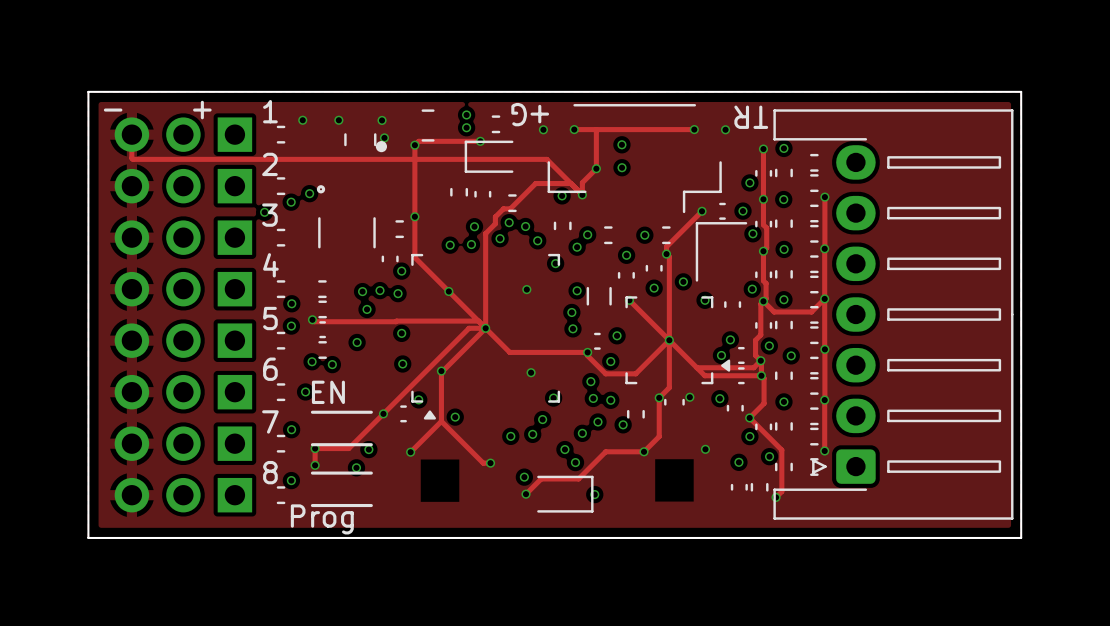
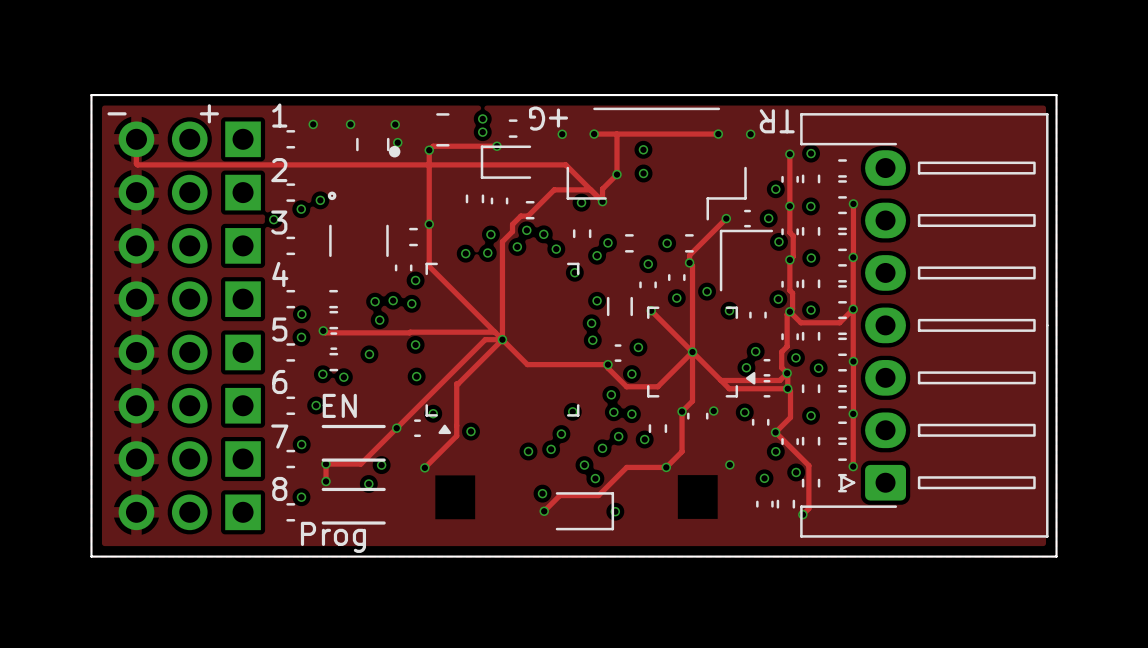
via: (526, 289) -> none
via: (448, 291) -> none
via: (441, 371) -> none
via: (531, 372) -> none
track: (441, 421) (483, 463) (490, 463) -> none
via: (490, 463) -> none

